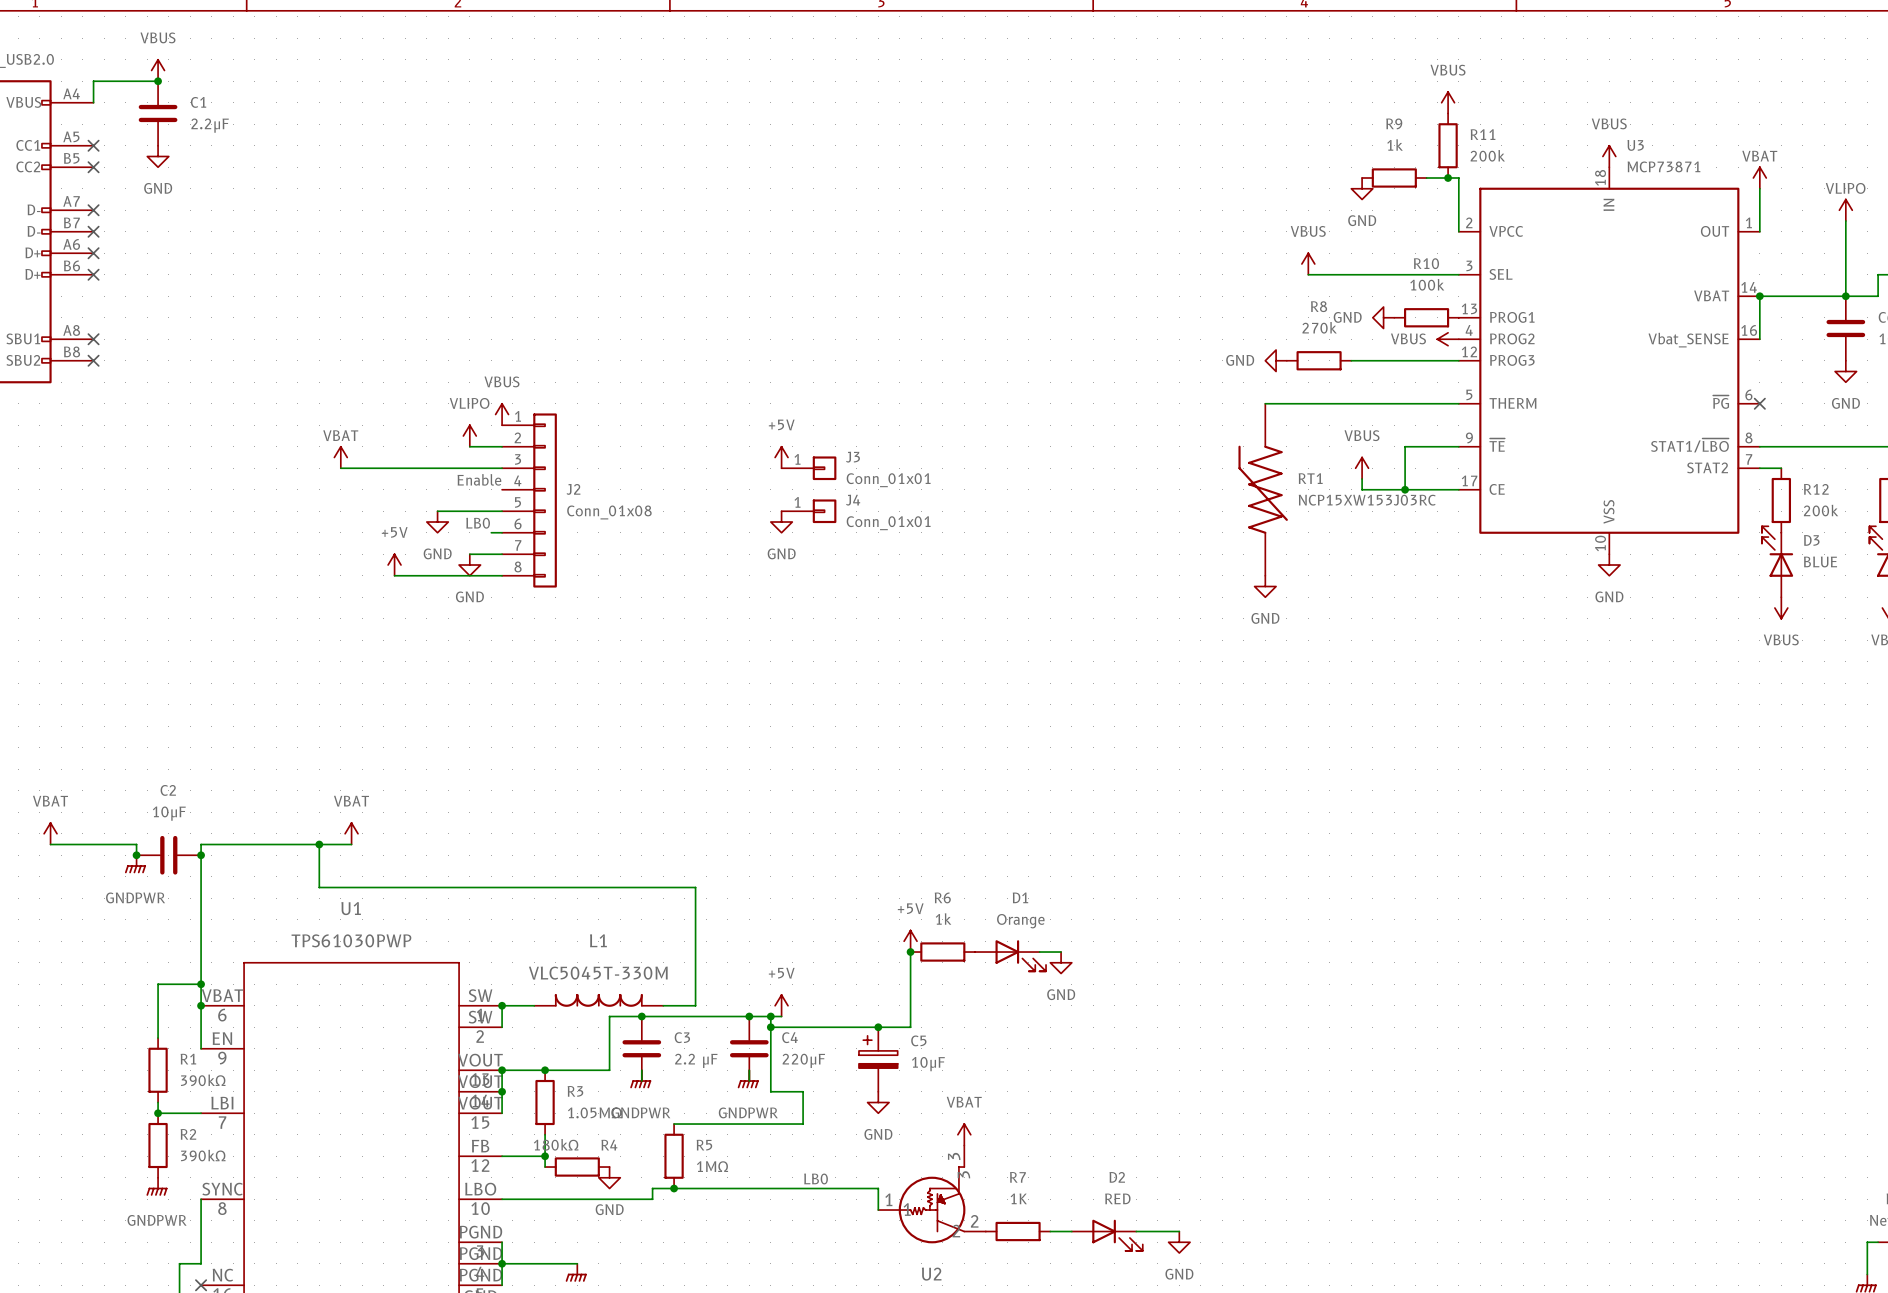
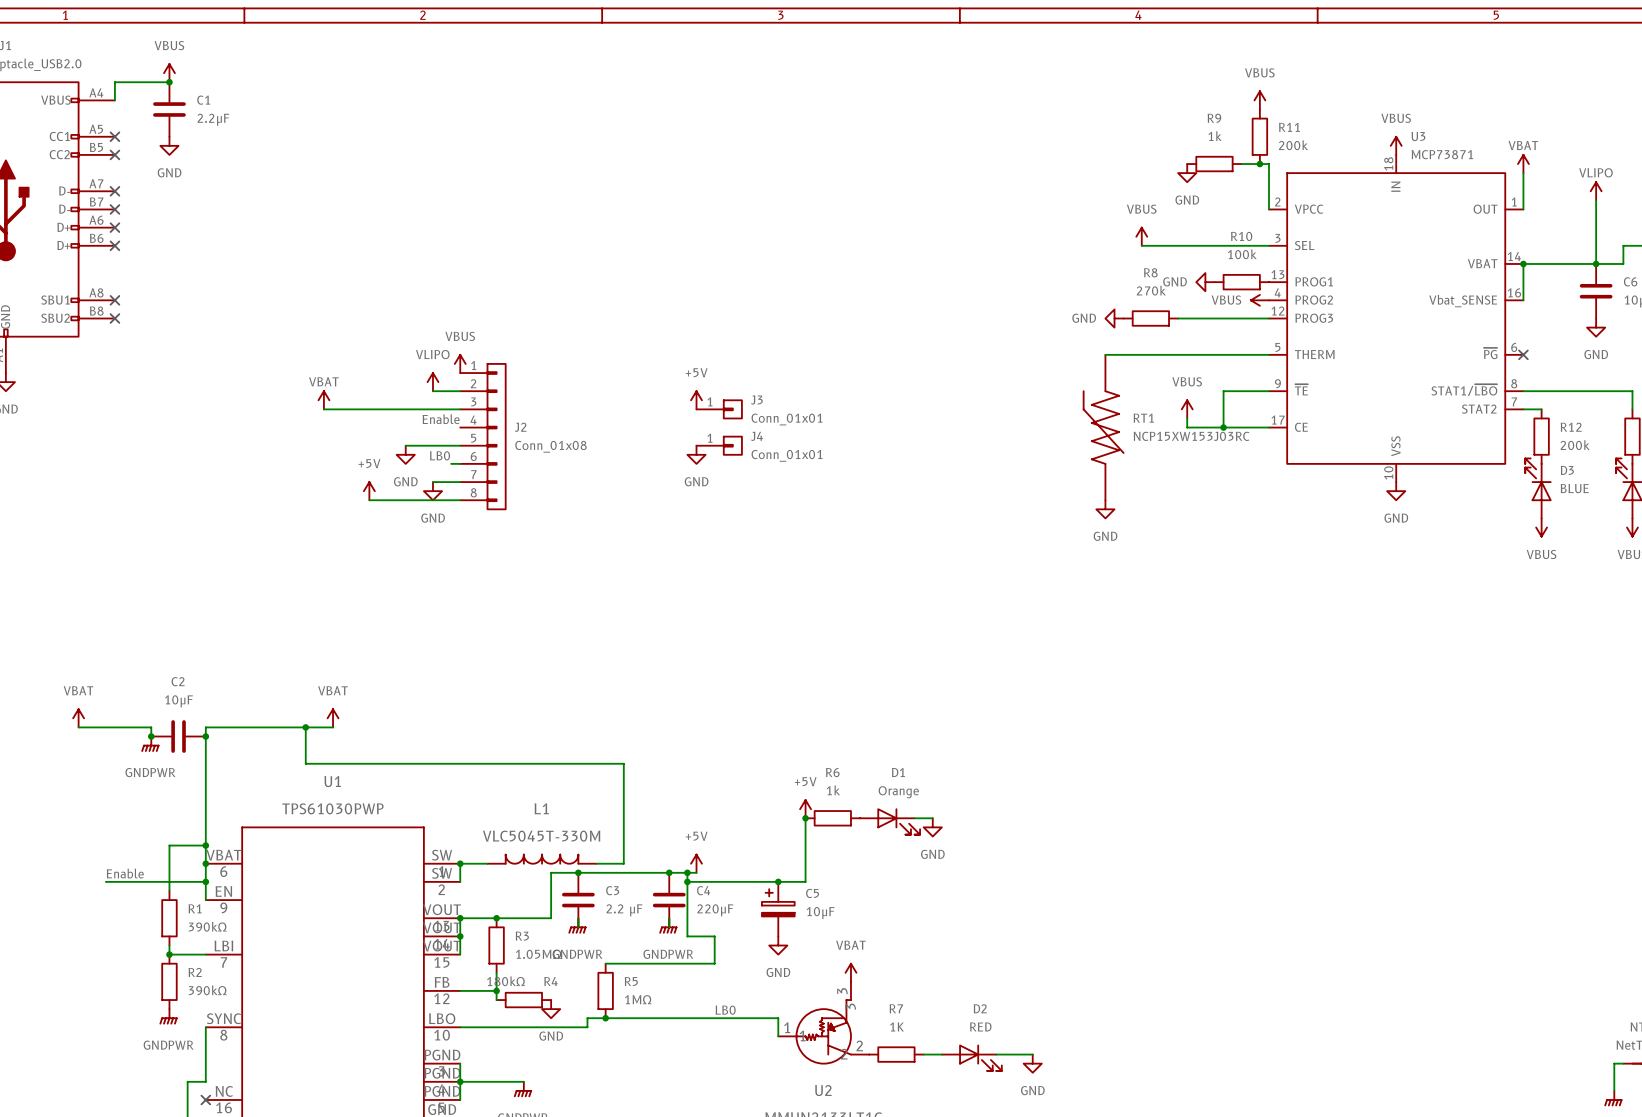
label: none -> Enable (125, 873)
wire: none -> (105, 881) (205, 881)
junction: none -> (205, 881)

